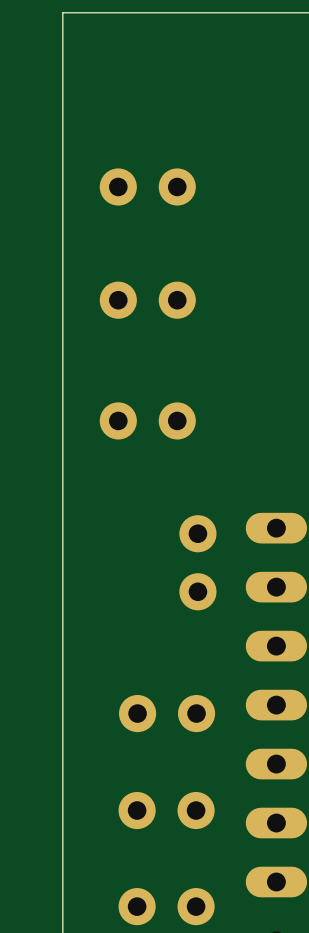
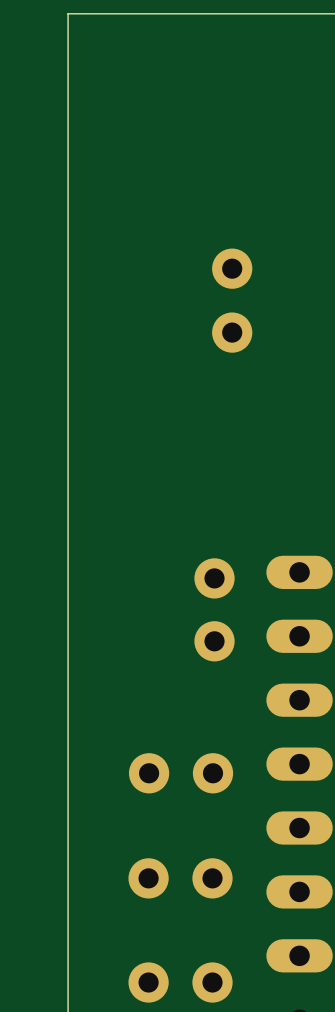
part: (147, 186) -> none
part: none -> (232, 300)
part: (147, 300) -> none
part: (147, 420) -> none

